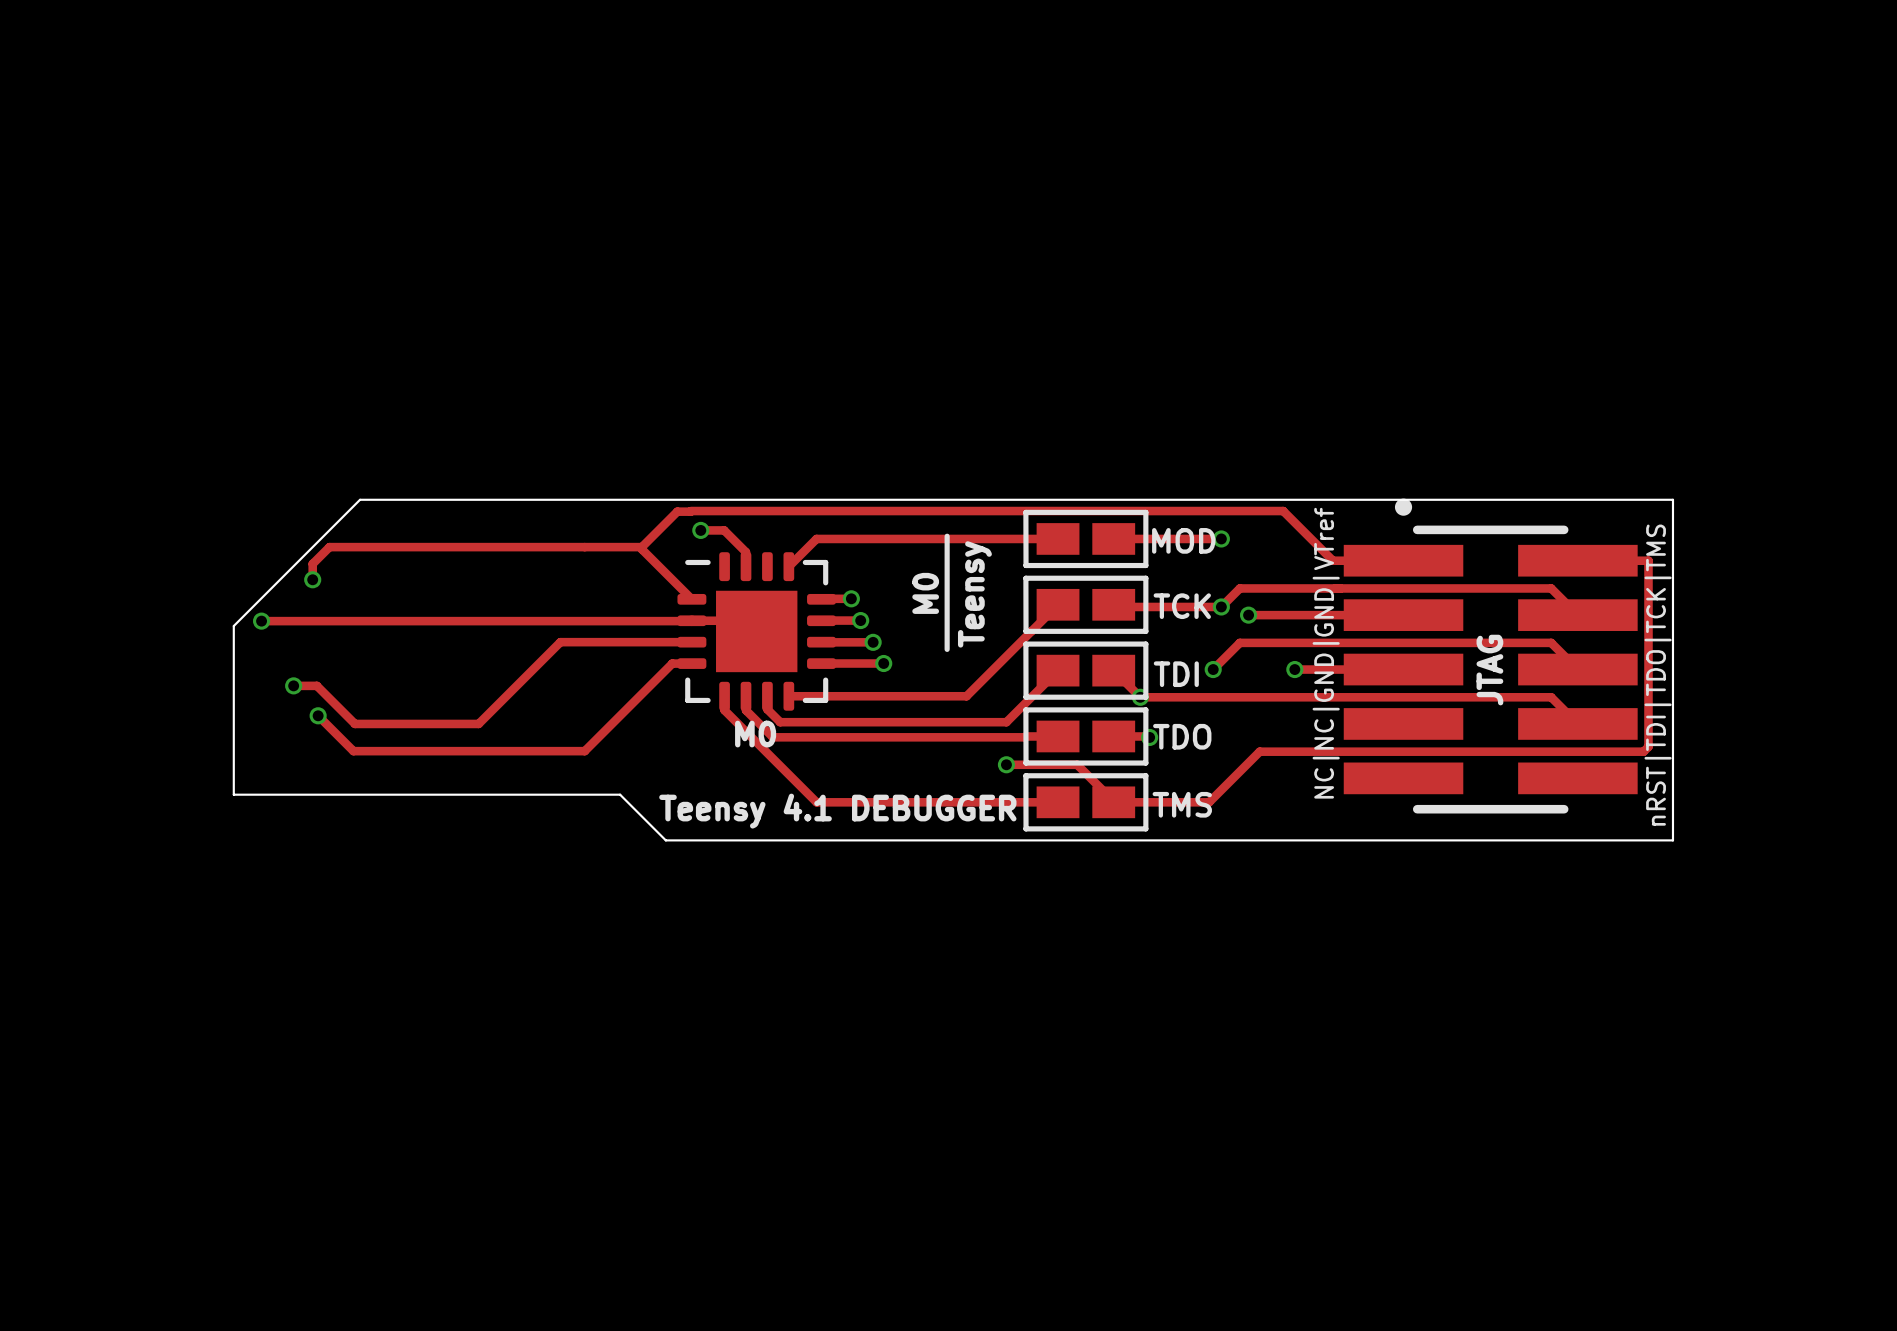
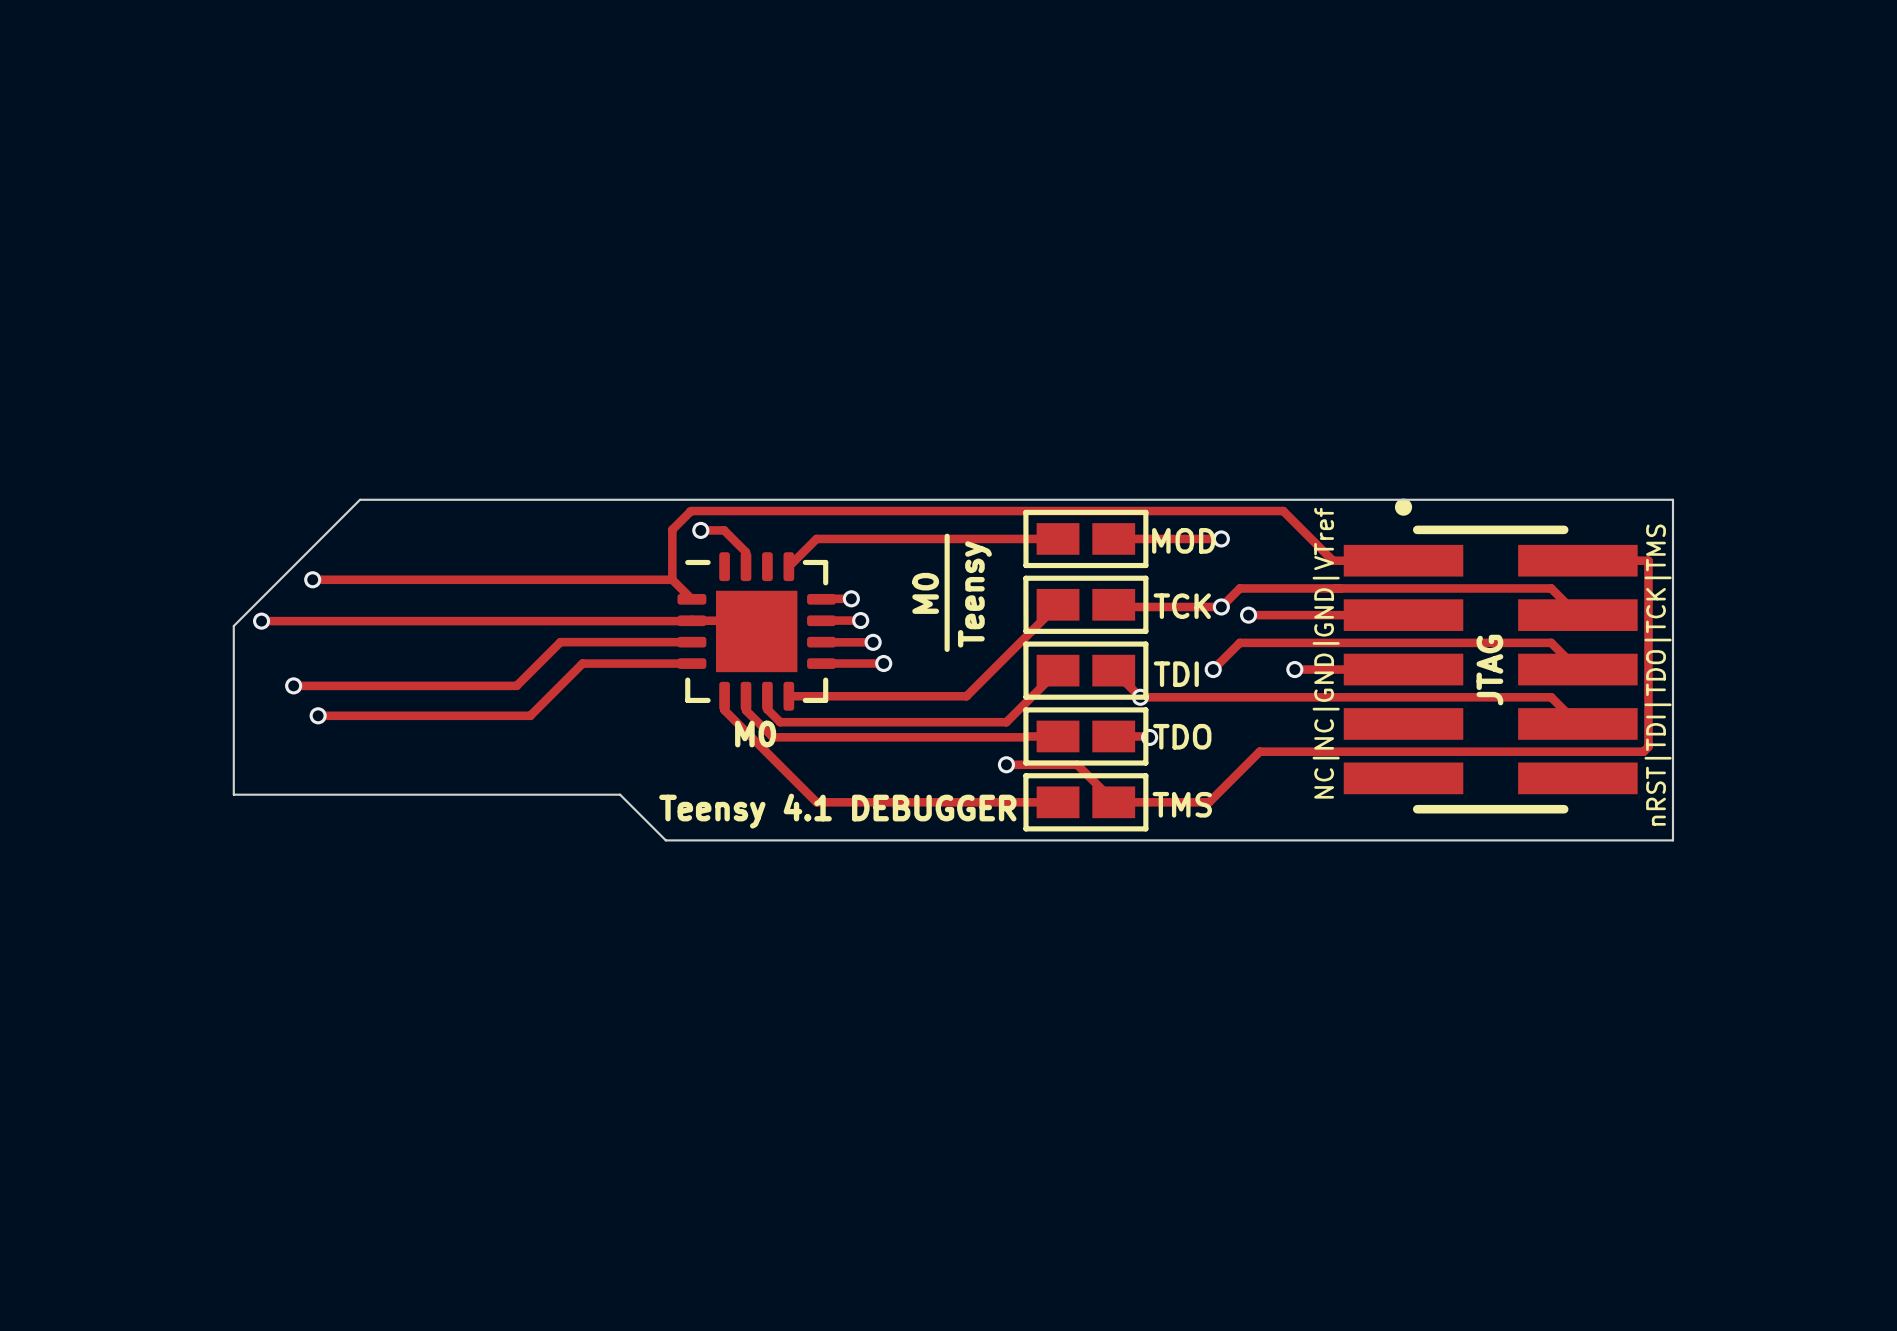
track: (690, 511) (677, 511) (641, 547) -> none
track: (641, 547) (329, 547) (312, 563) (312, 579) -> (690, 511) (672, 529) (672, 579) (312, 579)
track: (641, 547) (672, 579) -> none
track: (672, 663) (584, 751) (353, 751) (318, 715) -> (672, 663) (582, 663) (530, 715) (318, 715)
track: (316, 685) (354, 723) (478, 723) (516, 685) -> (316, 685) (516, 685)

